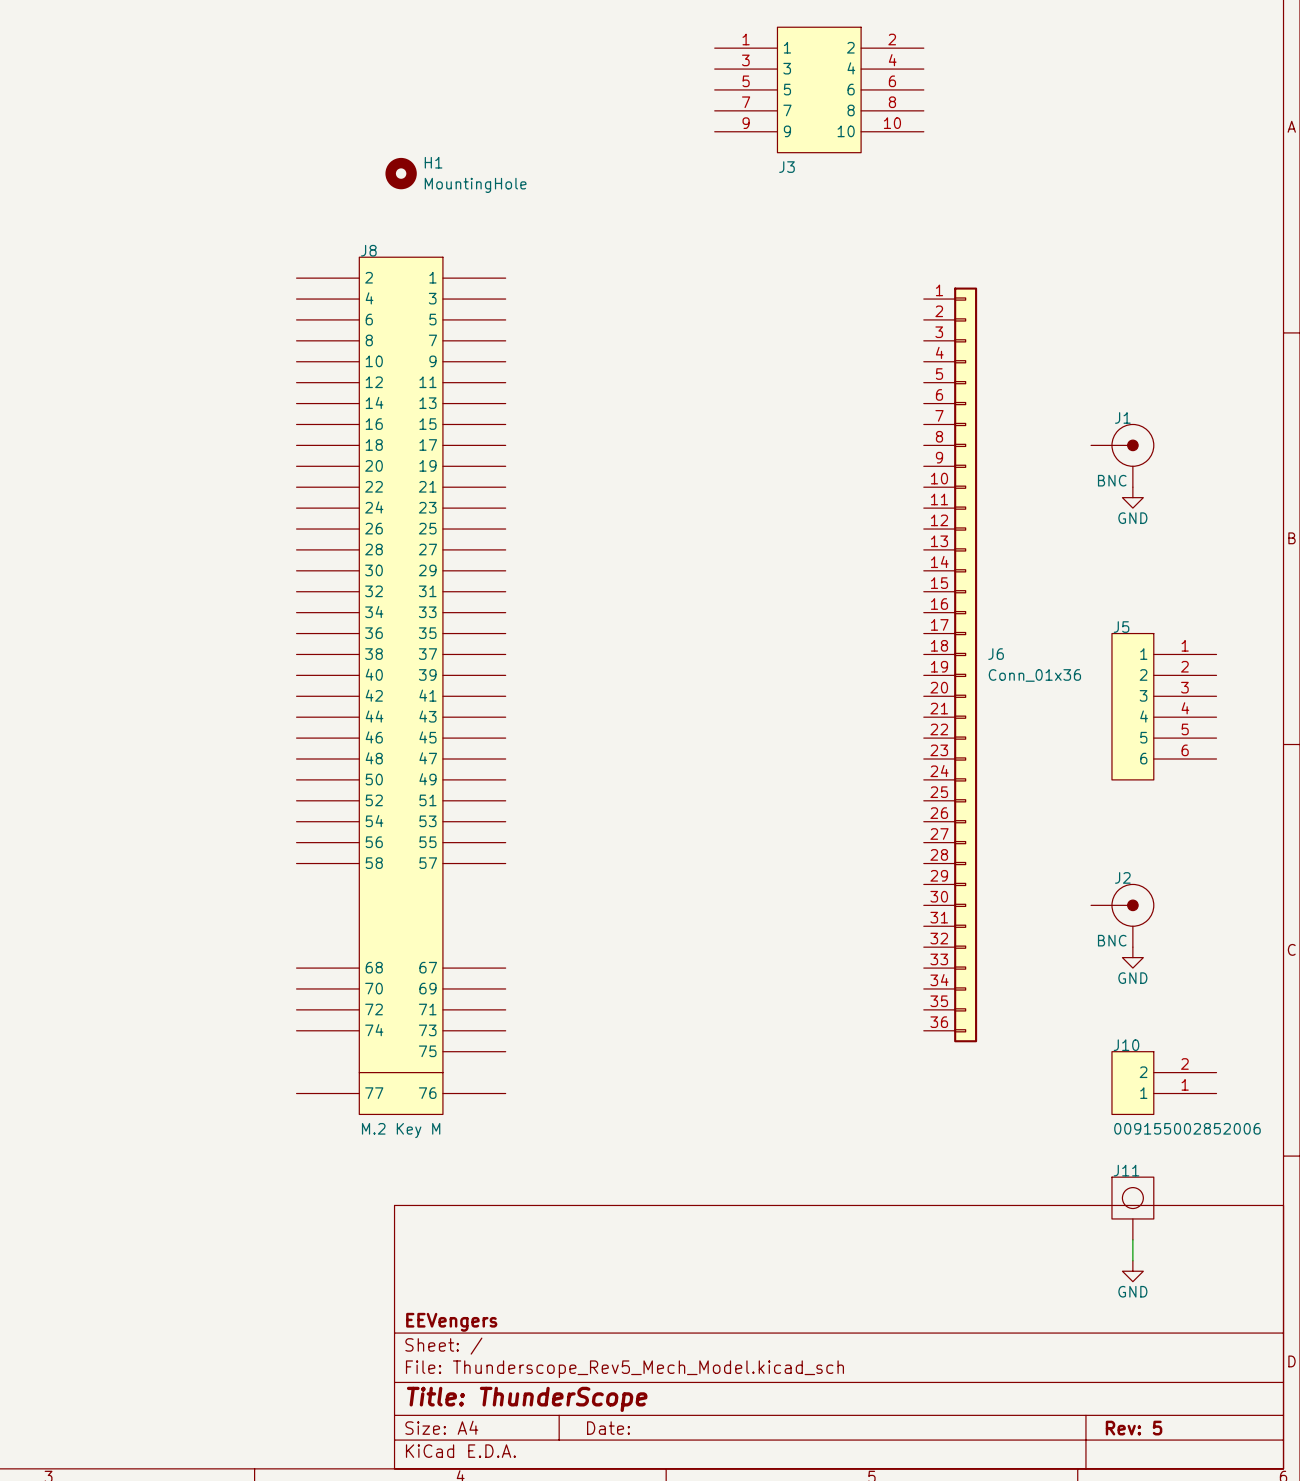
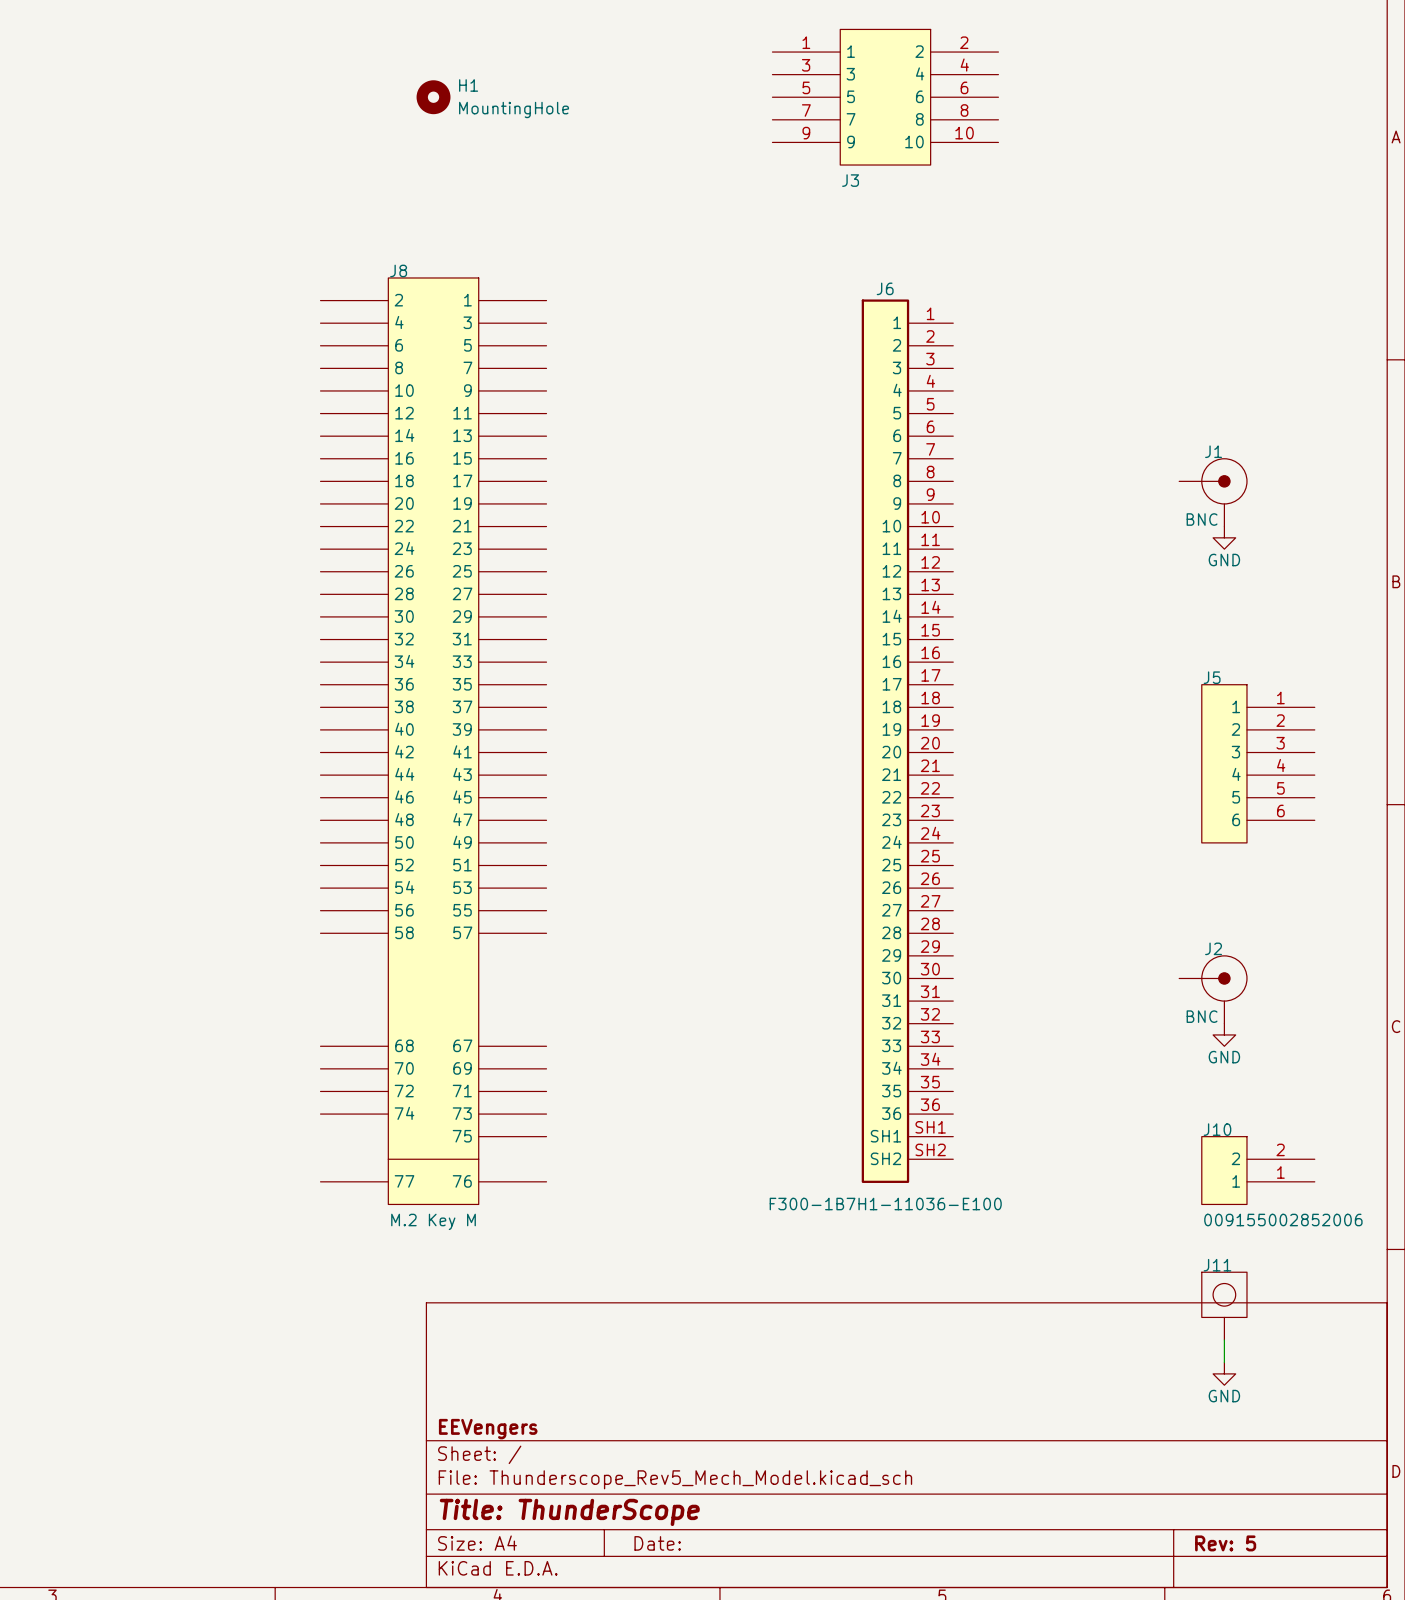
H1 position: (401, 173) -> (433, 97)
J6 symbol: [923, 287, 978, 1043] -> [861, 299, 954, 1183]
J6 name position: J6 (996, 654) -> J6 (885, 288)
J6 value: Conn_01x36 (1034, 675) -> F300-1B7H1-11036-E100 (885, 1204)

